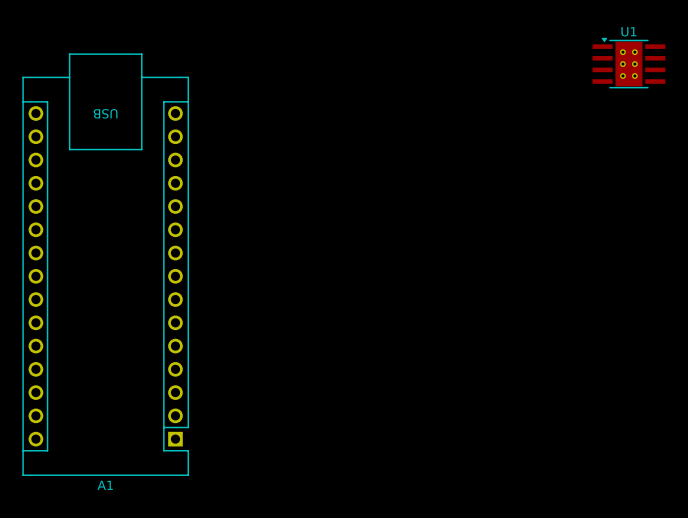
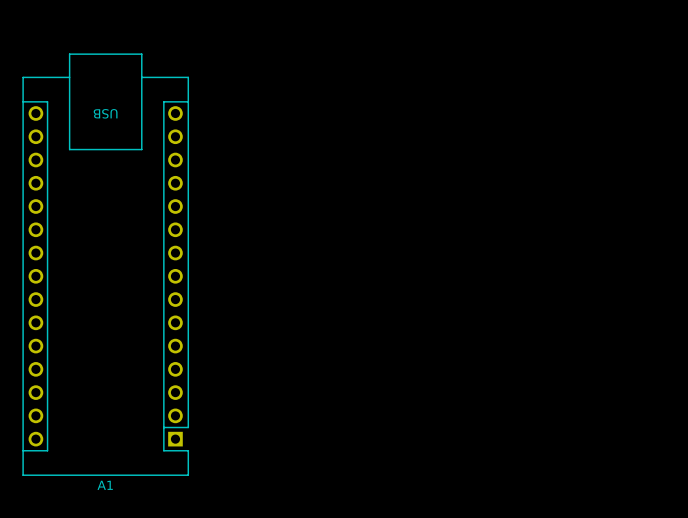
U1: (628, 63) -> none

